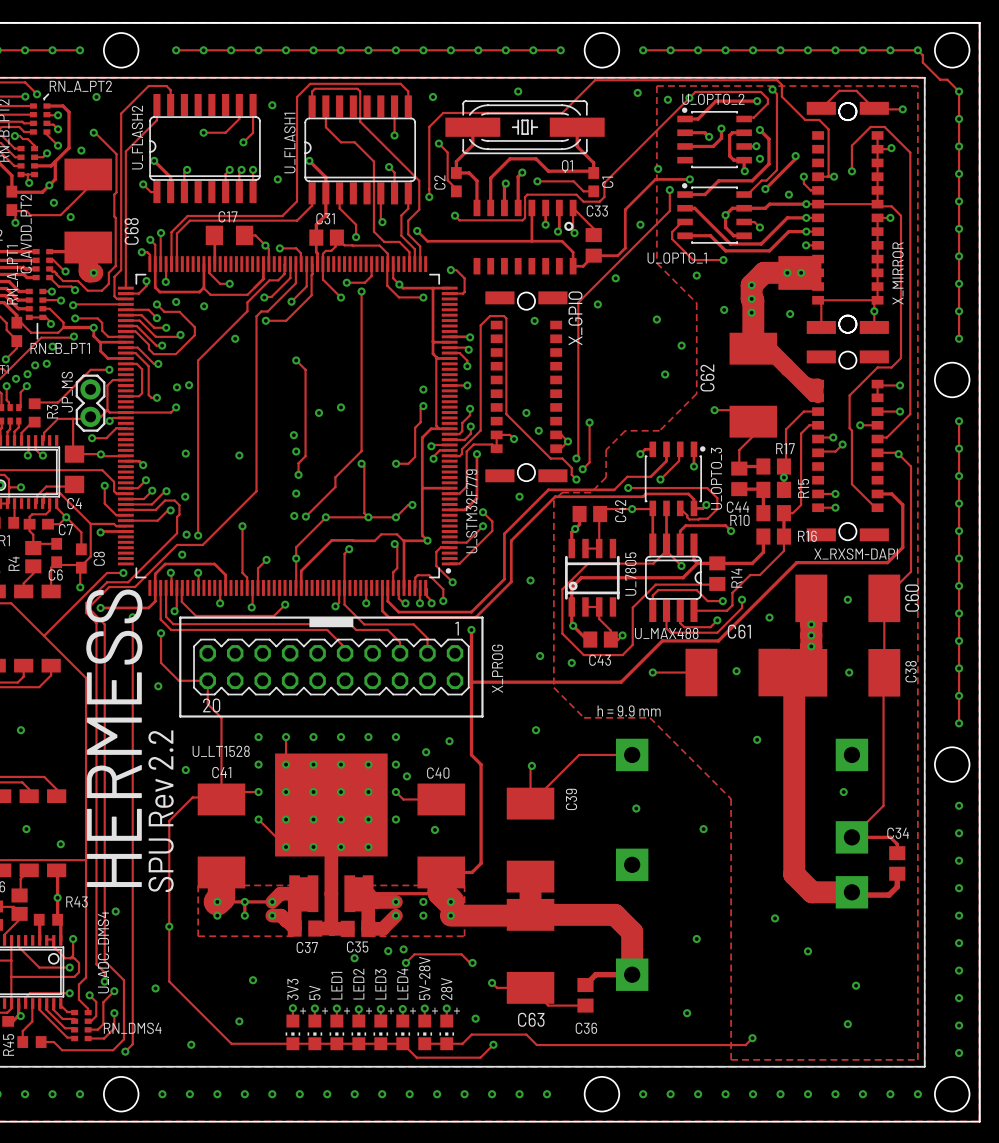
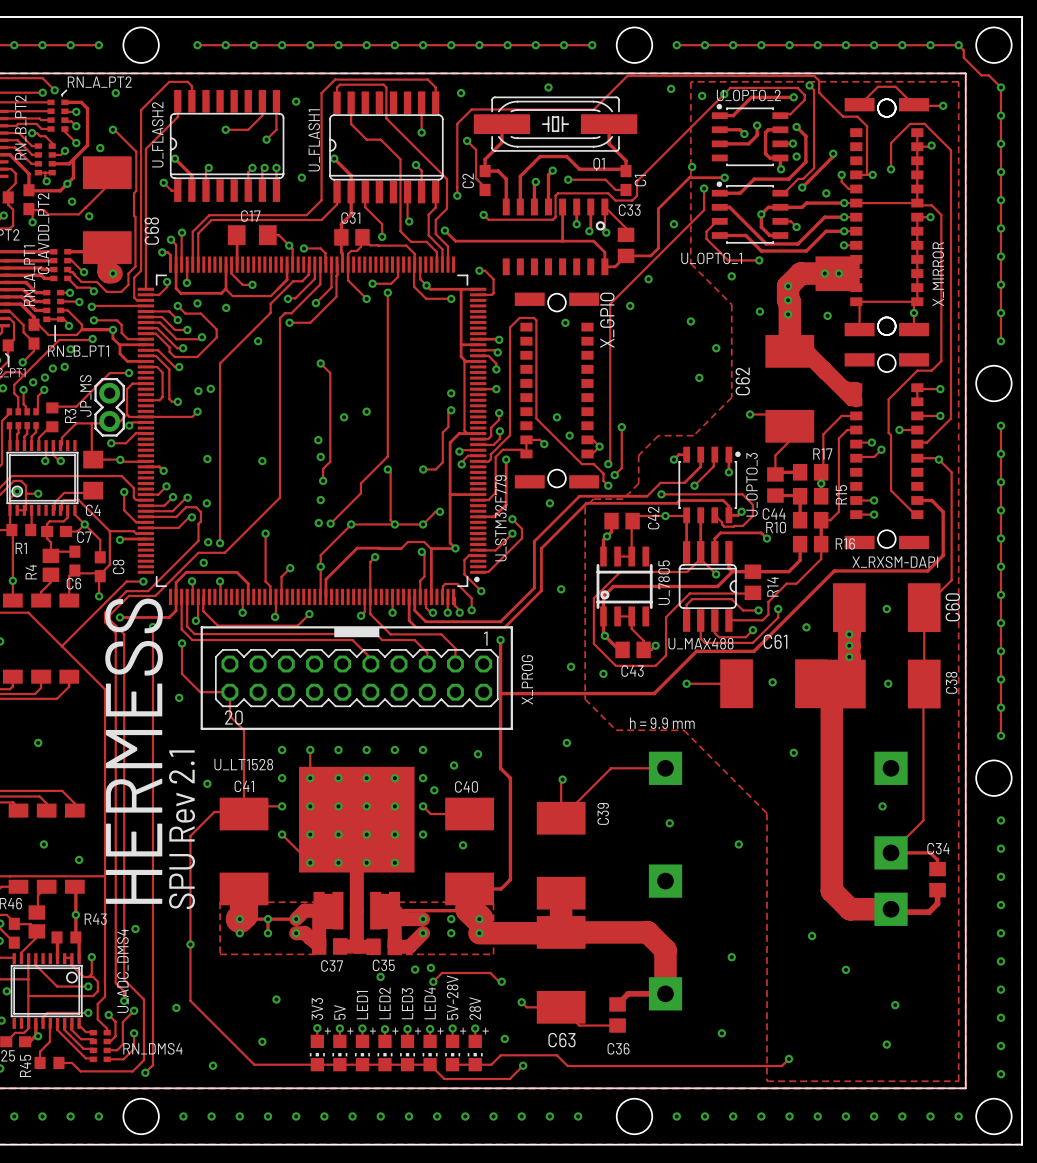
text: SPU Rev 2.2 (161, 811) -> SPU Rev 2.1 (182, 829)

